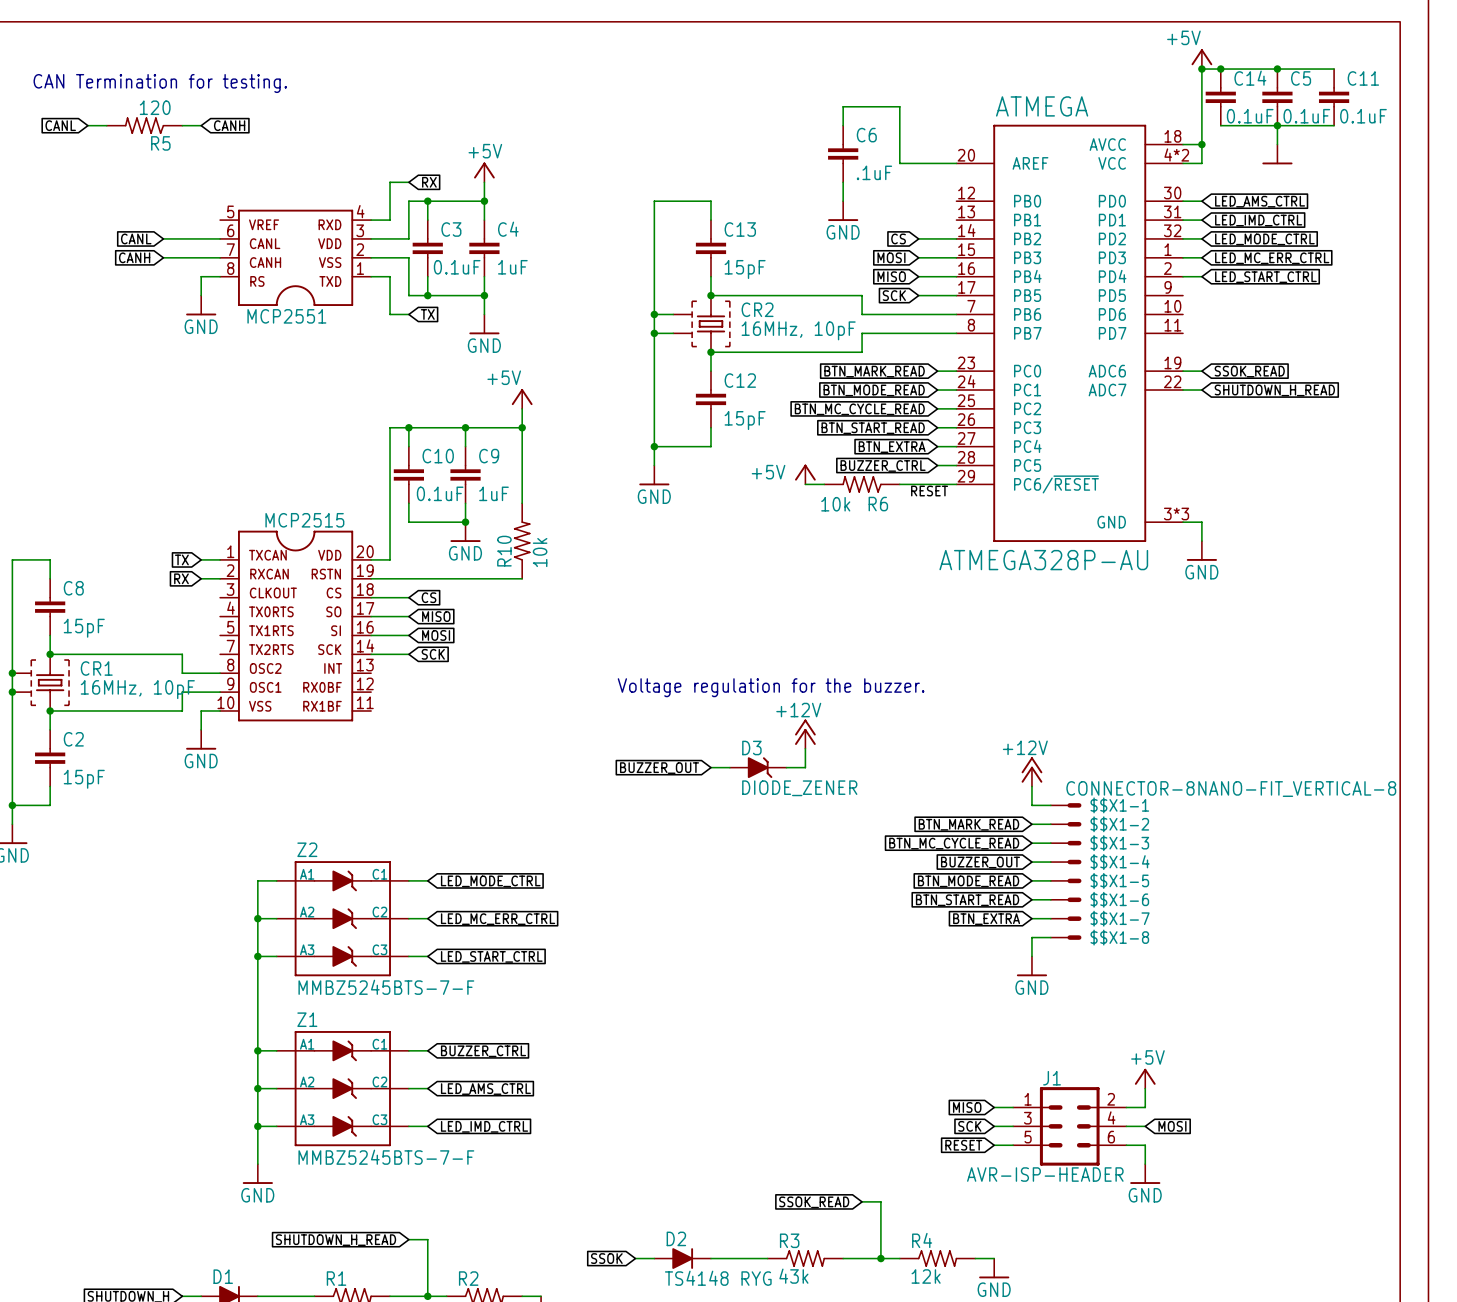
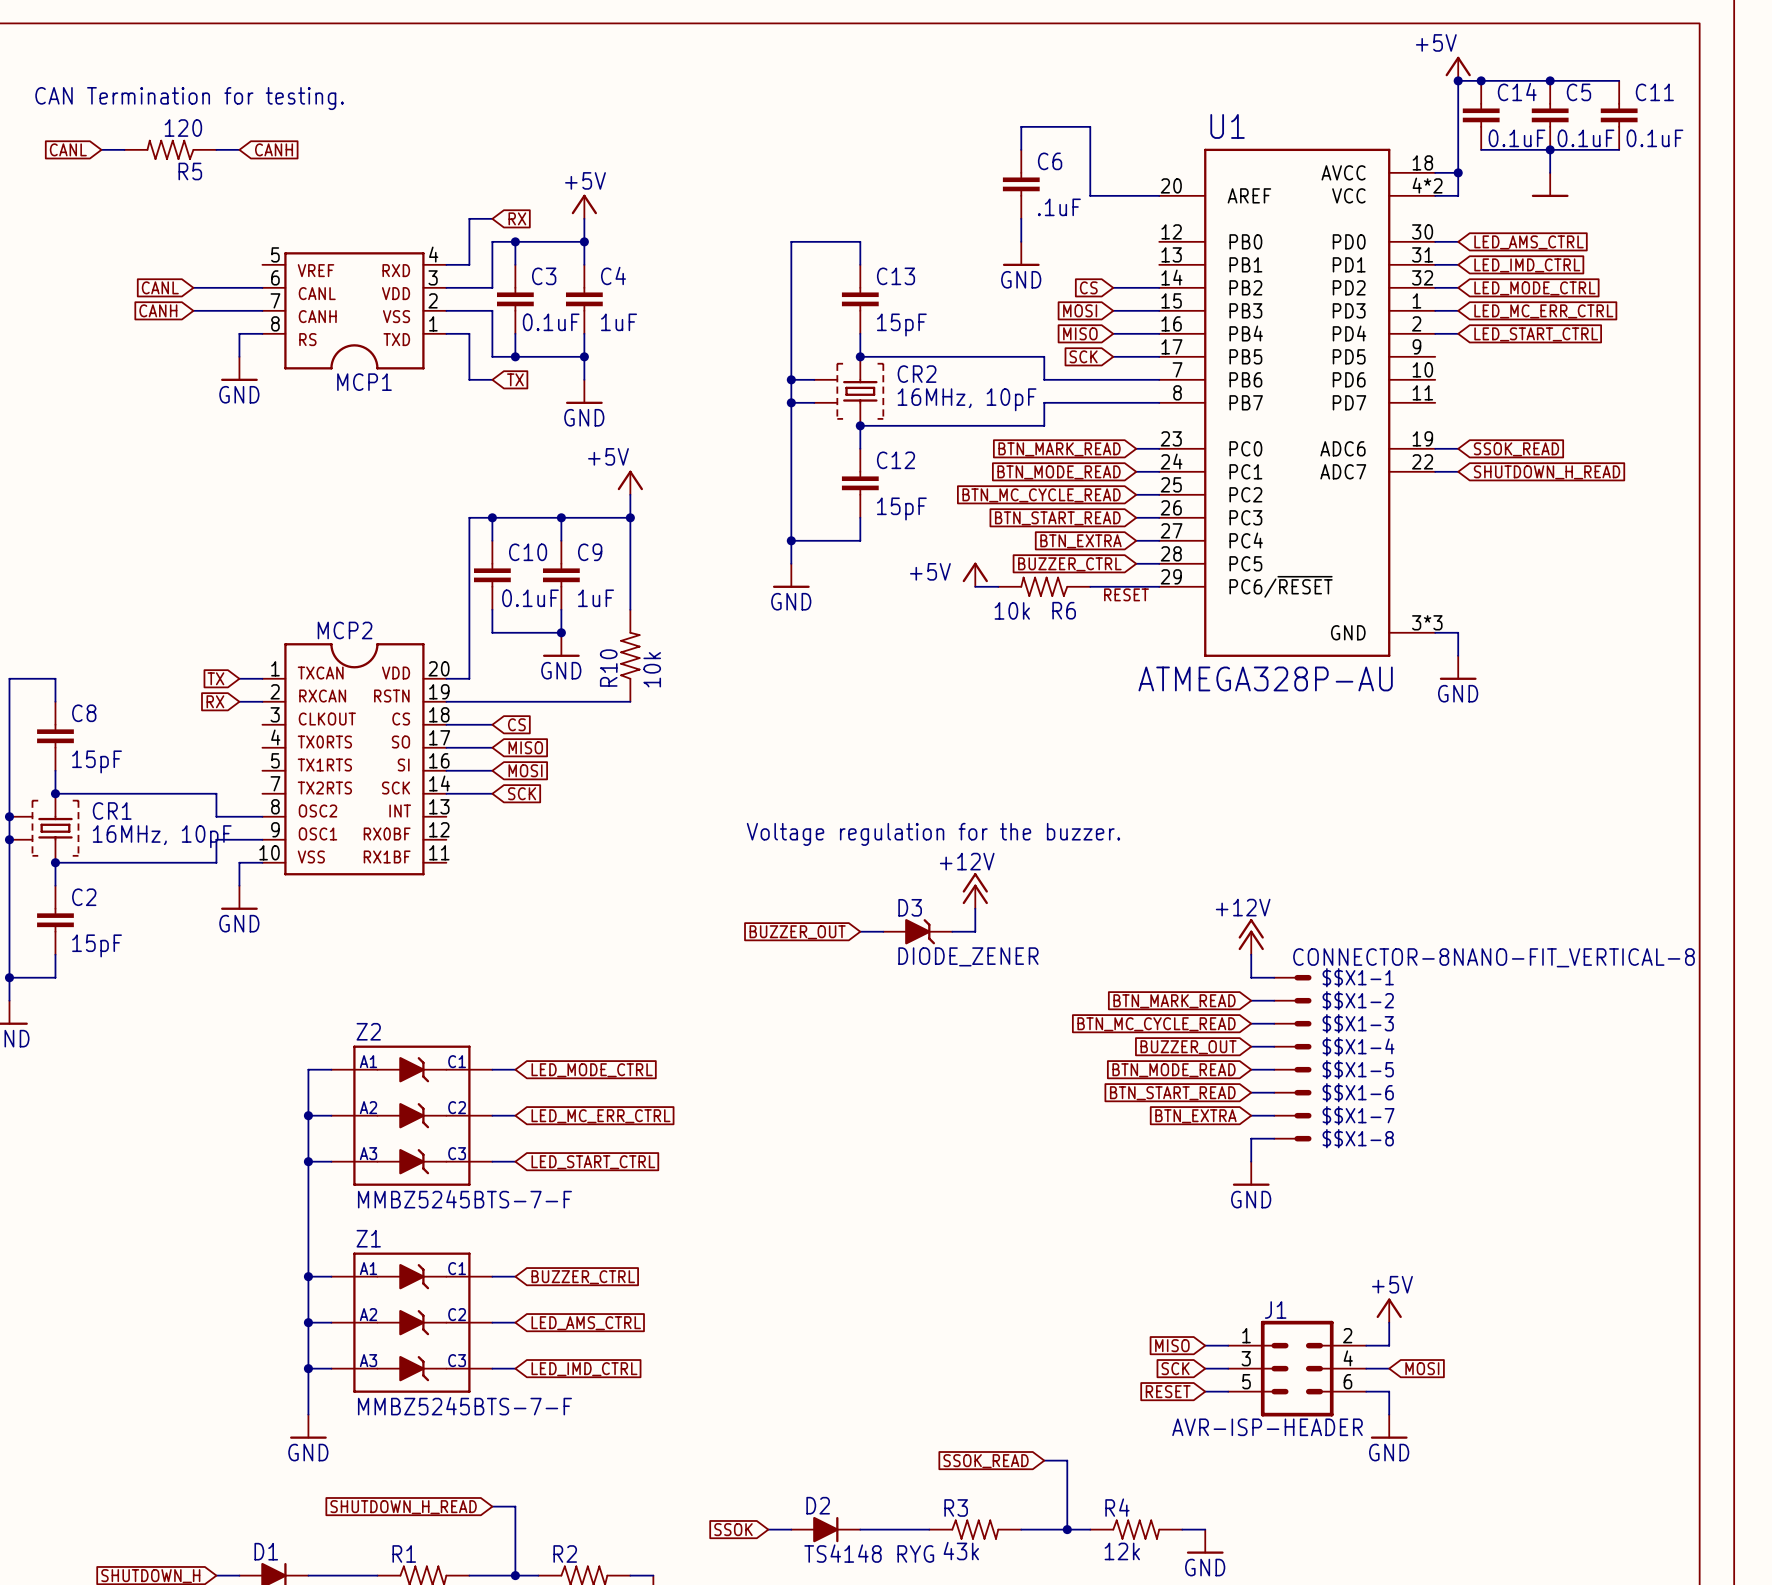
ATMEGA name: ATMEGA (1042, 106) -> U1 (1227, 126)
MCP2551 name: MCP2551 (286, 316) -> MCP1 (364, 382)
MCP2515 name: MCP2515 (304, 520) -> MCP2 (345, 630)

